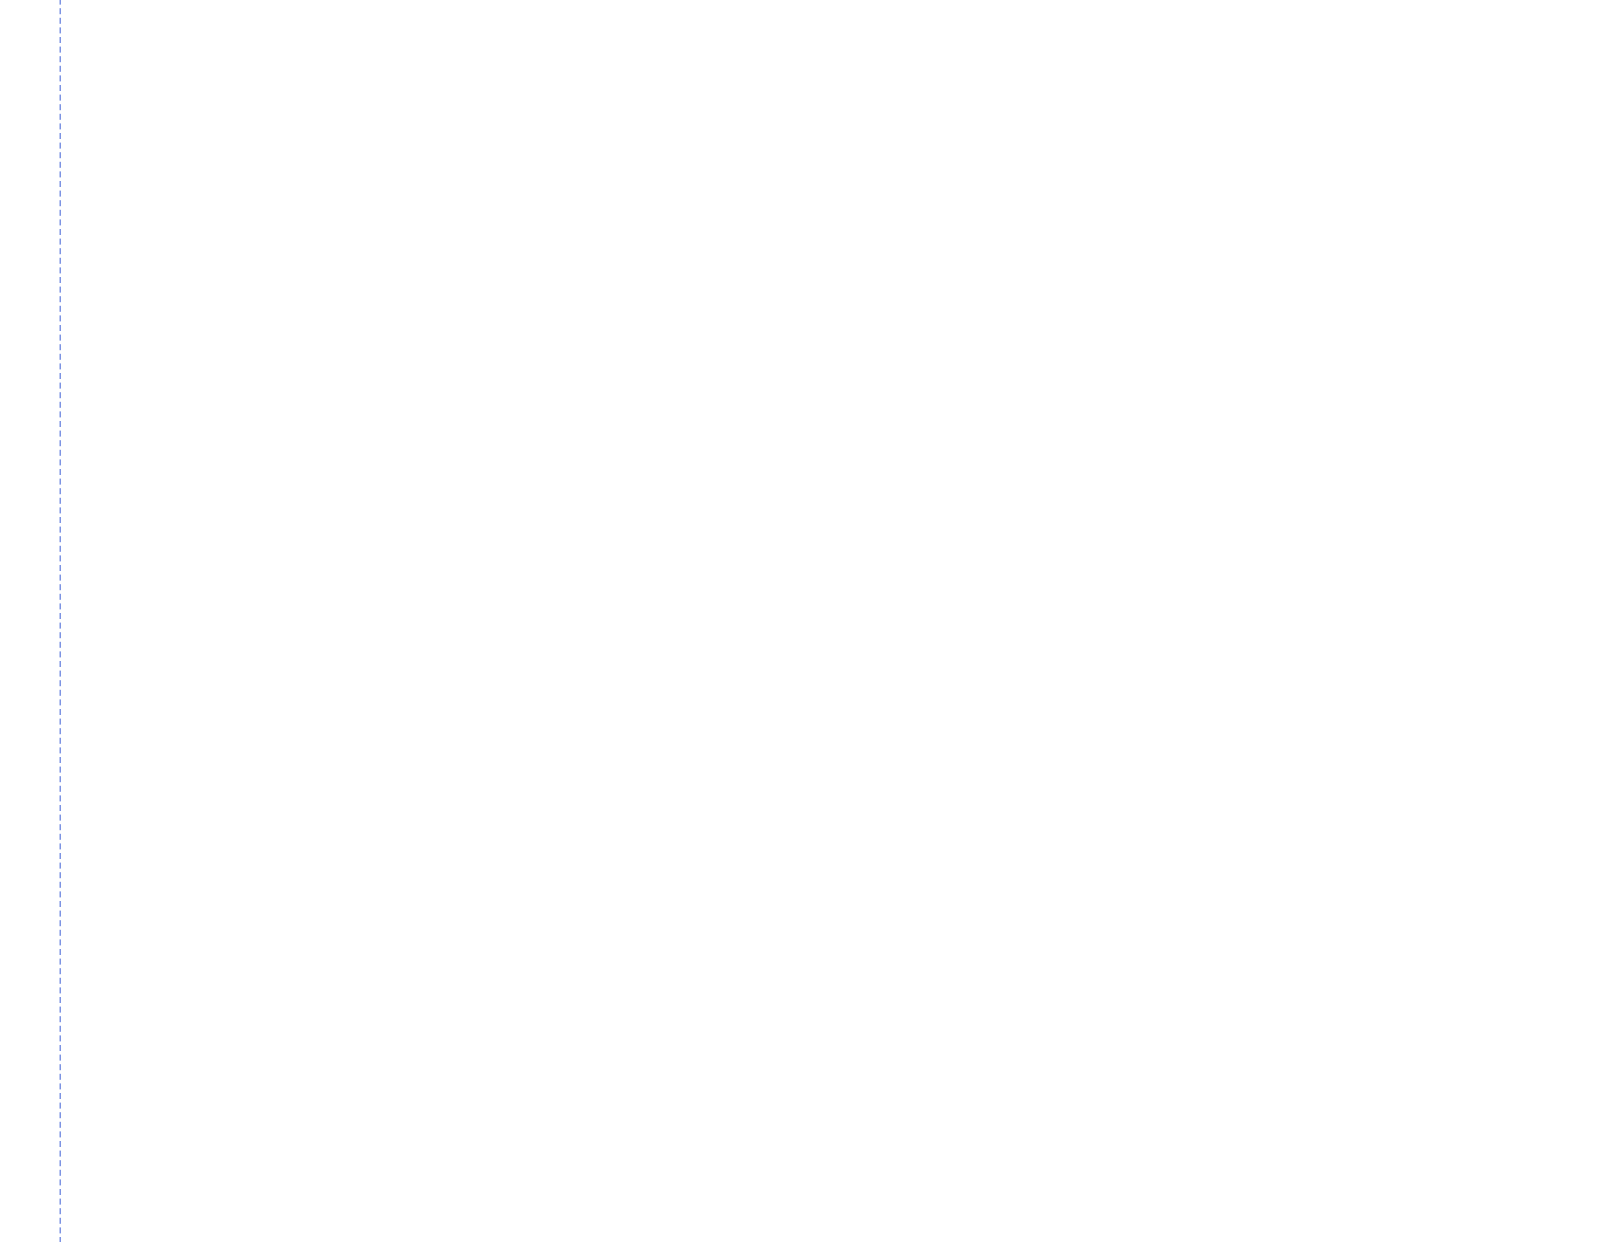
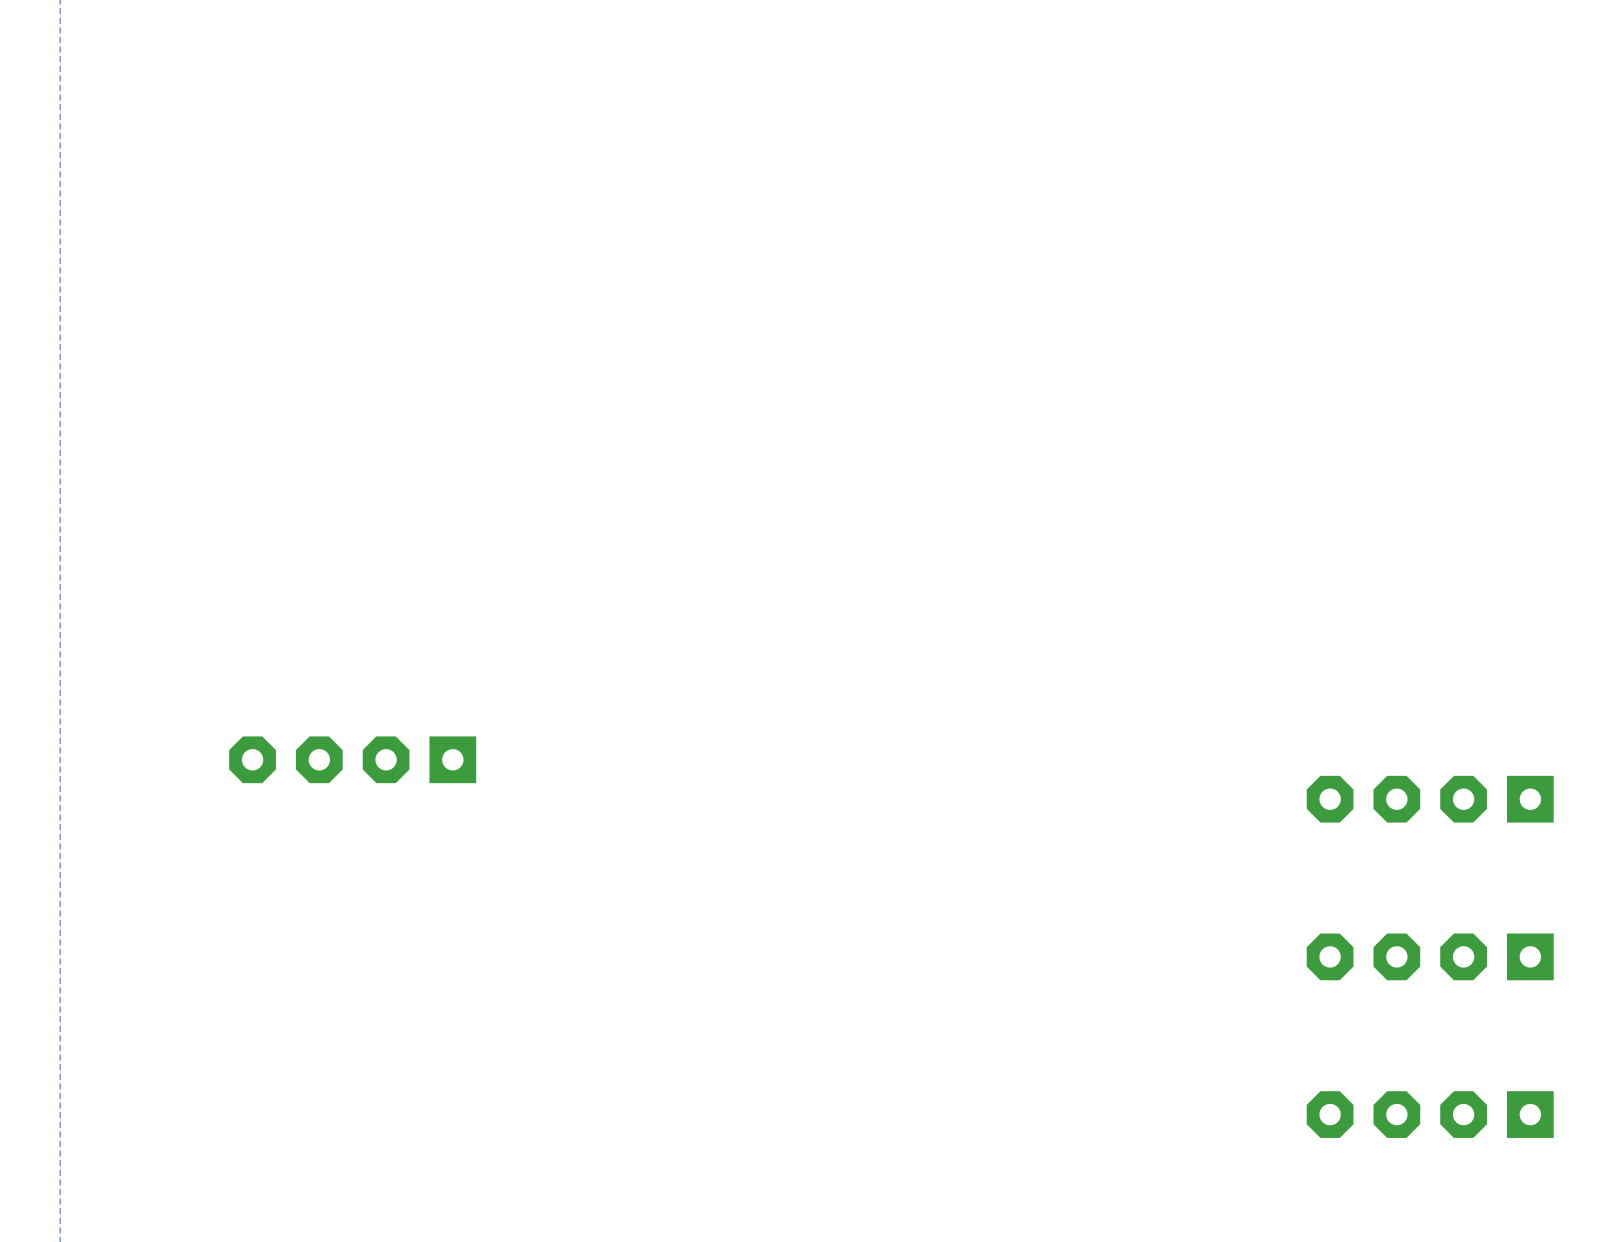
part: none -> (352, 759)
part: none -> (1430, 799)
part: none -> (1430, 956)
part: none -> (1430, 1114)

